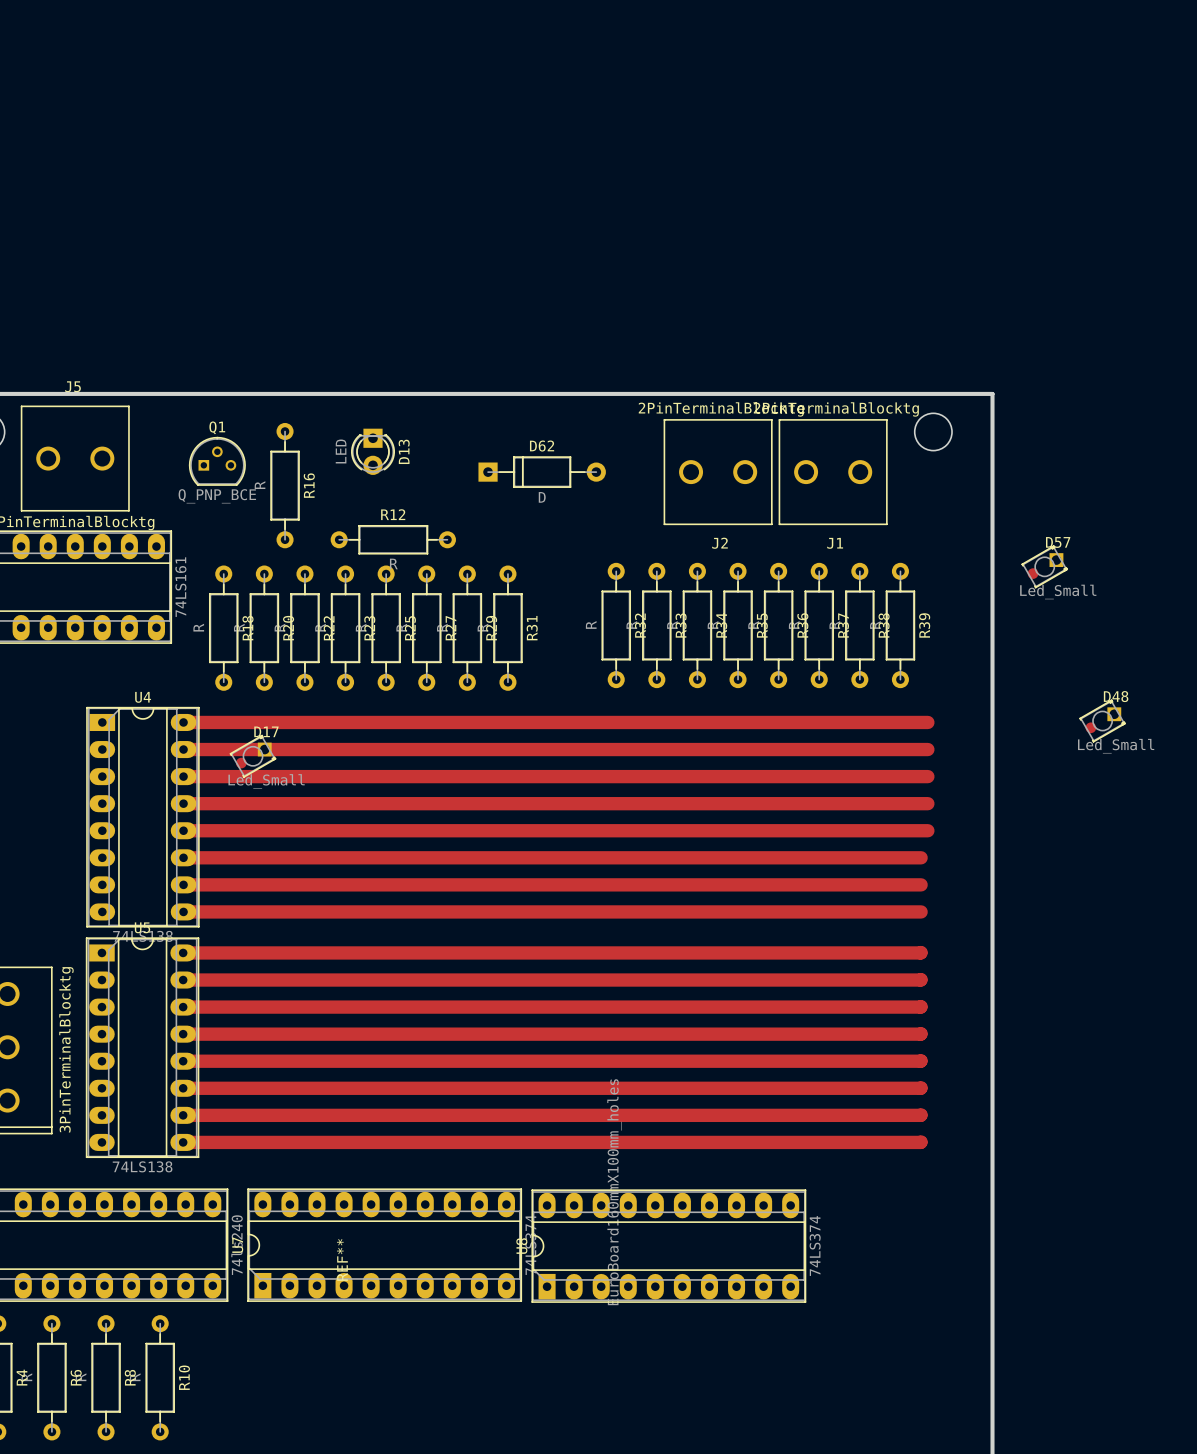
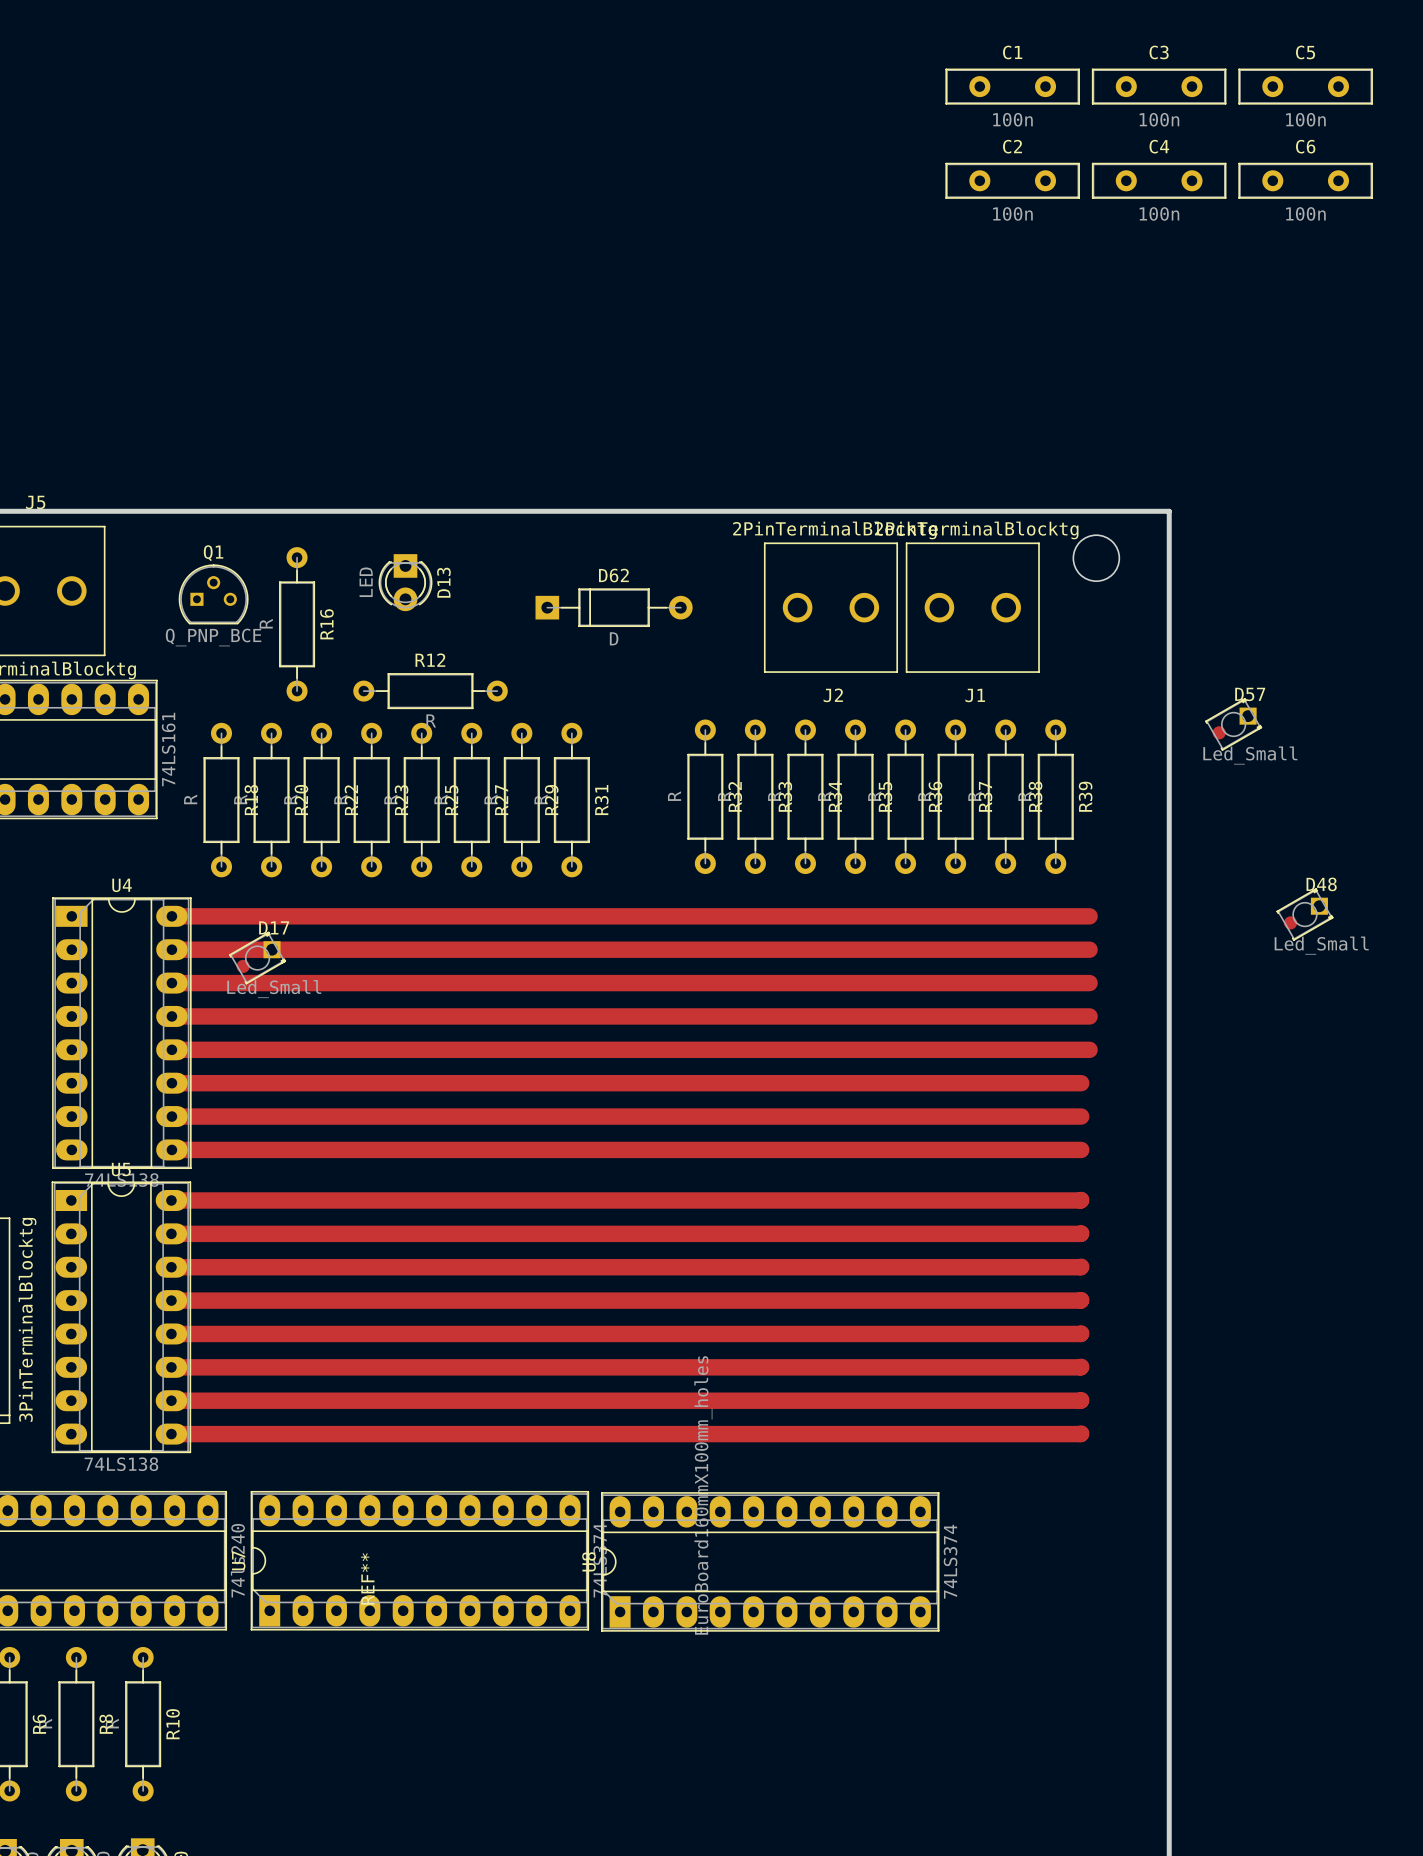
C1: none -> 100n (1012, 86)
C3: none -> 100n (1159, 86)
C5: none -> 100n (1305, 86)
C2: none -> 100n (1012, 180)
C4: none -> 100n (1159, 180)
C6: none -> 100n (1305, 180)

